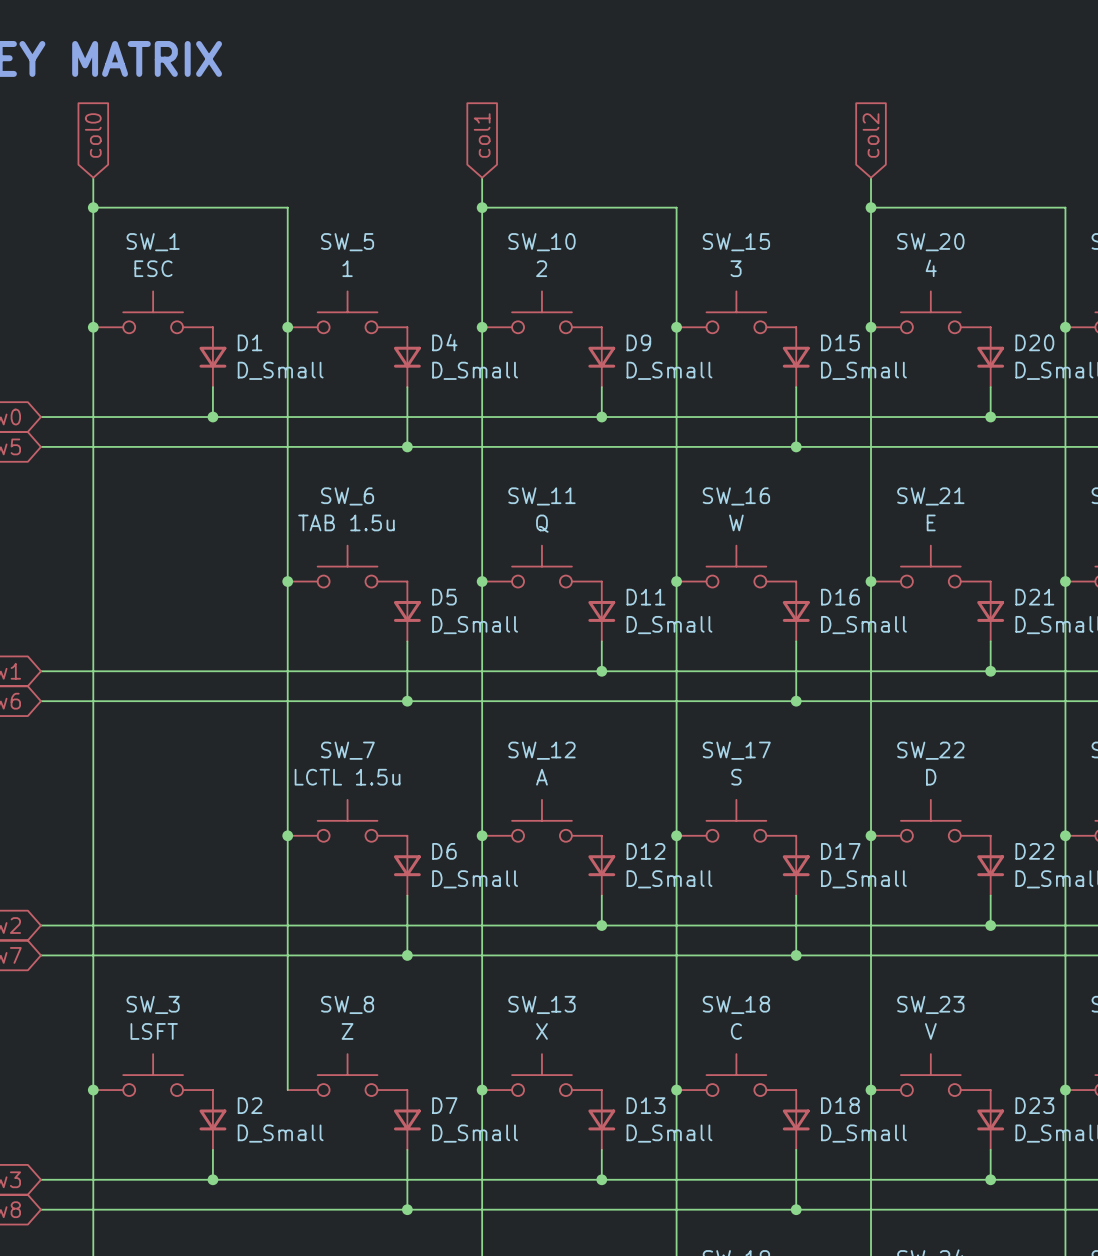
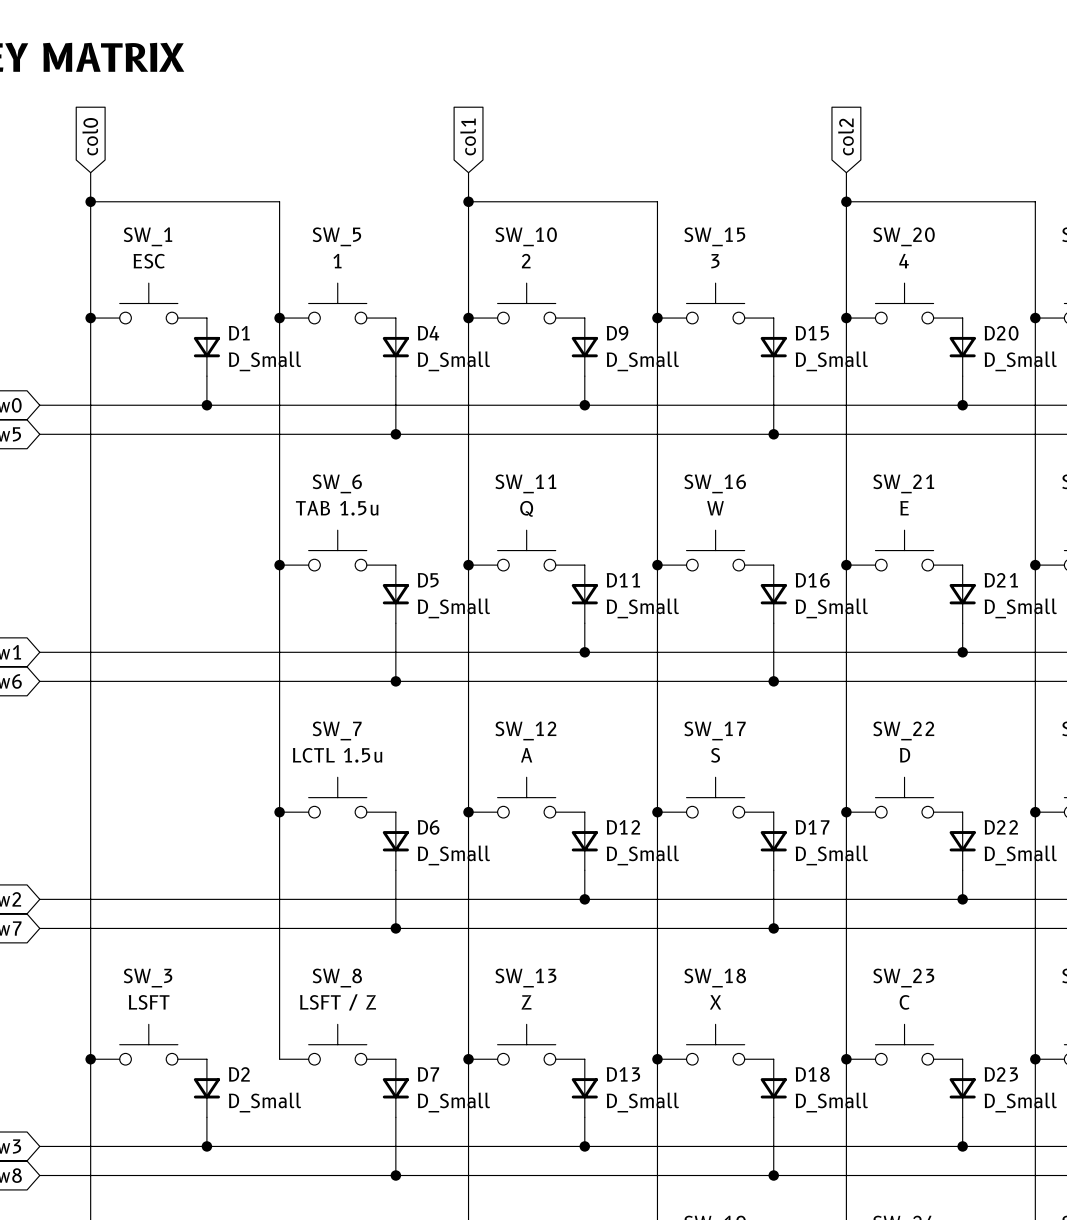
SW_8 value: Z (347, 1031) -> LSFT / Z (338, 1002)
SW_13 value: X (541, 1031) -> Z (526, 1002)
SW_18 value: C (736, 1031) -> X (715, 1002)
SW_23 value: V (930, 1031) -> C (904, 1002)

